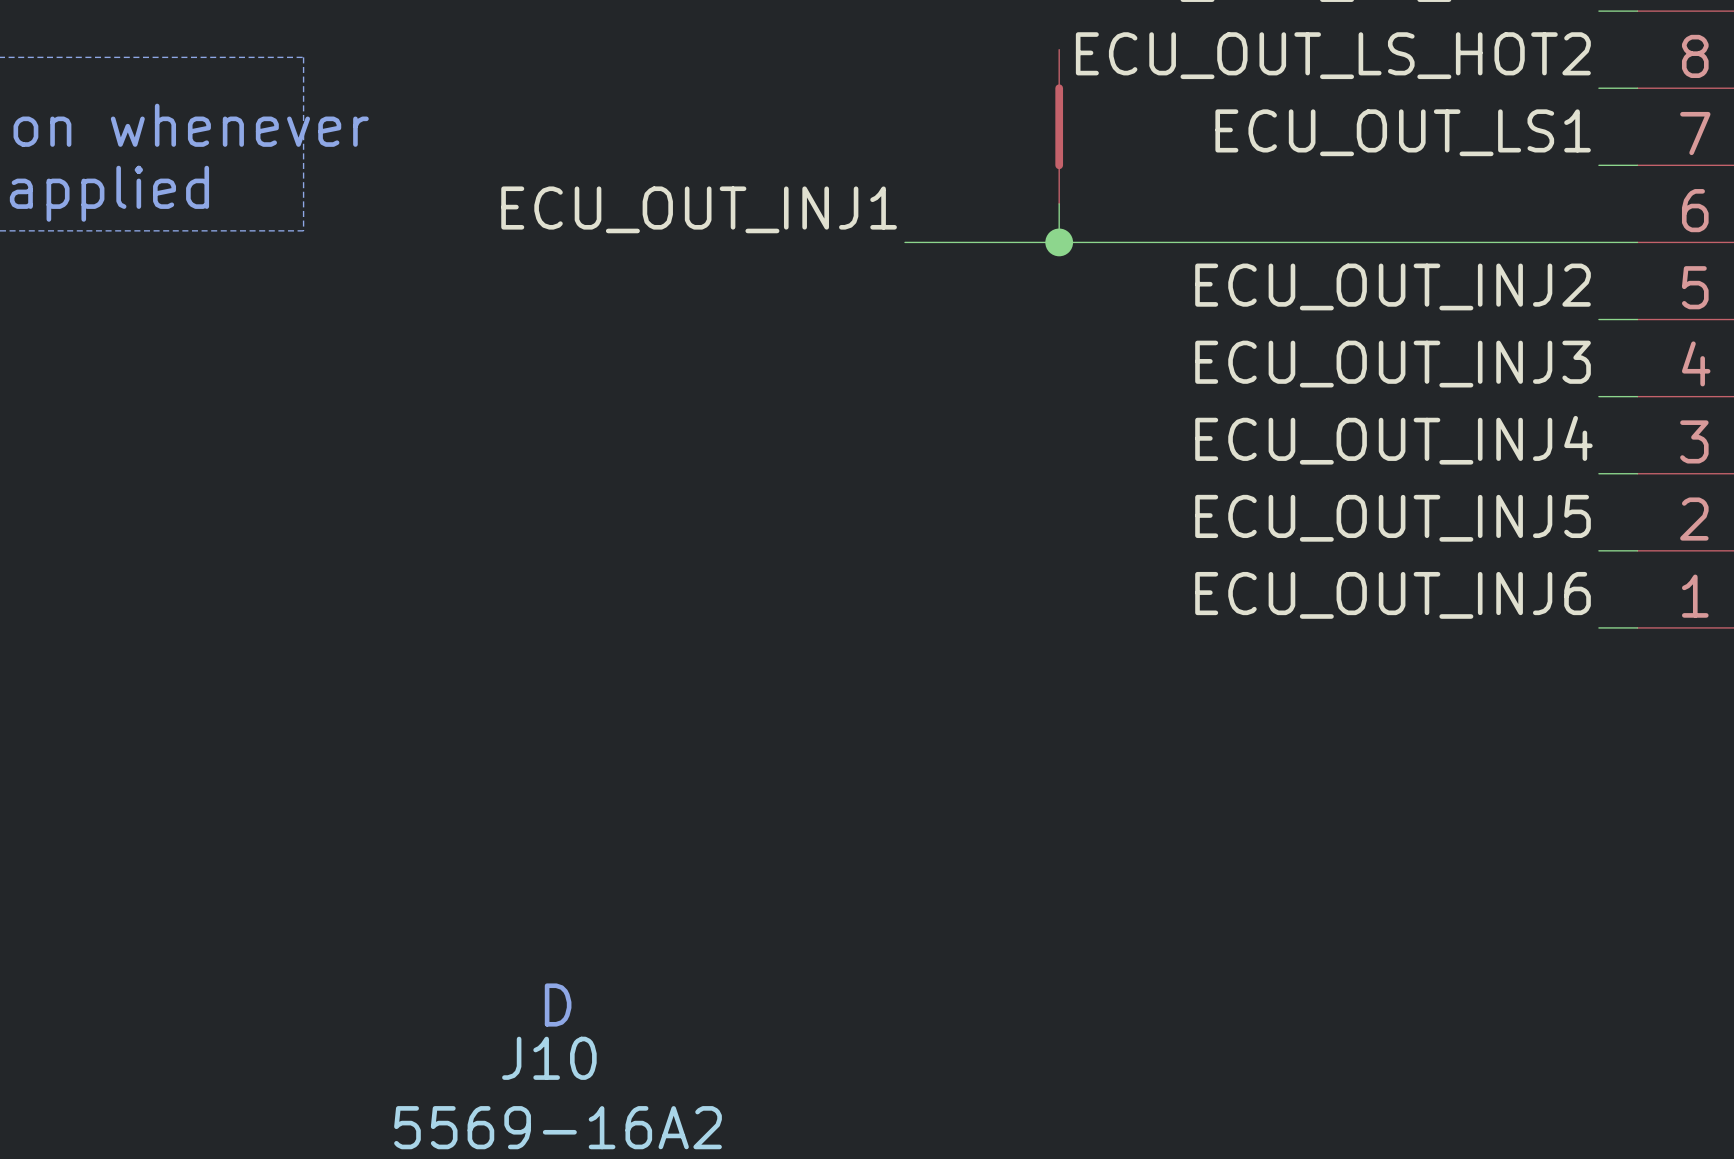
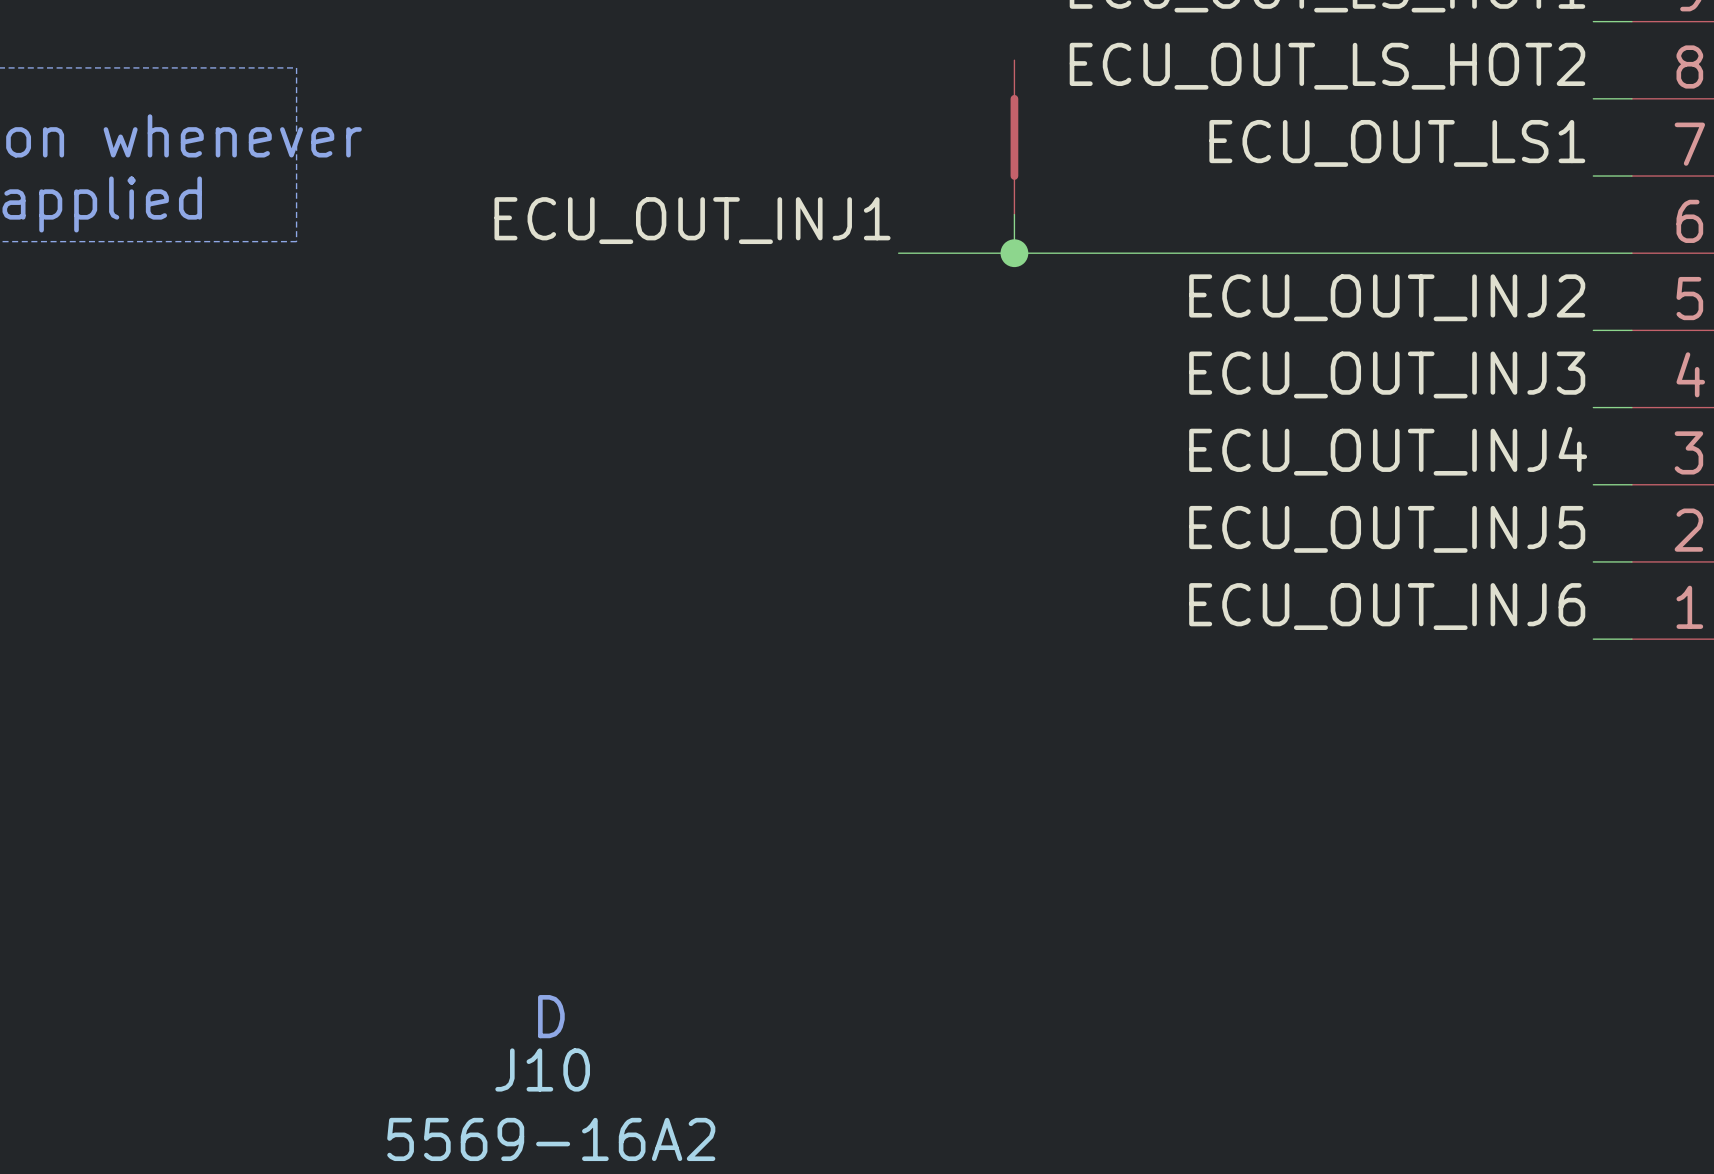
part position: (1059, 126) -> (1014, 137)
wire: (1059, 203) (1059, 242) -> (1014, 214) (1014, 253)
junction position: (1059, 242) -> (1014, 253)

